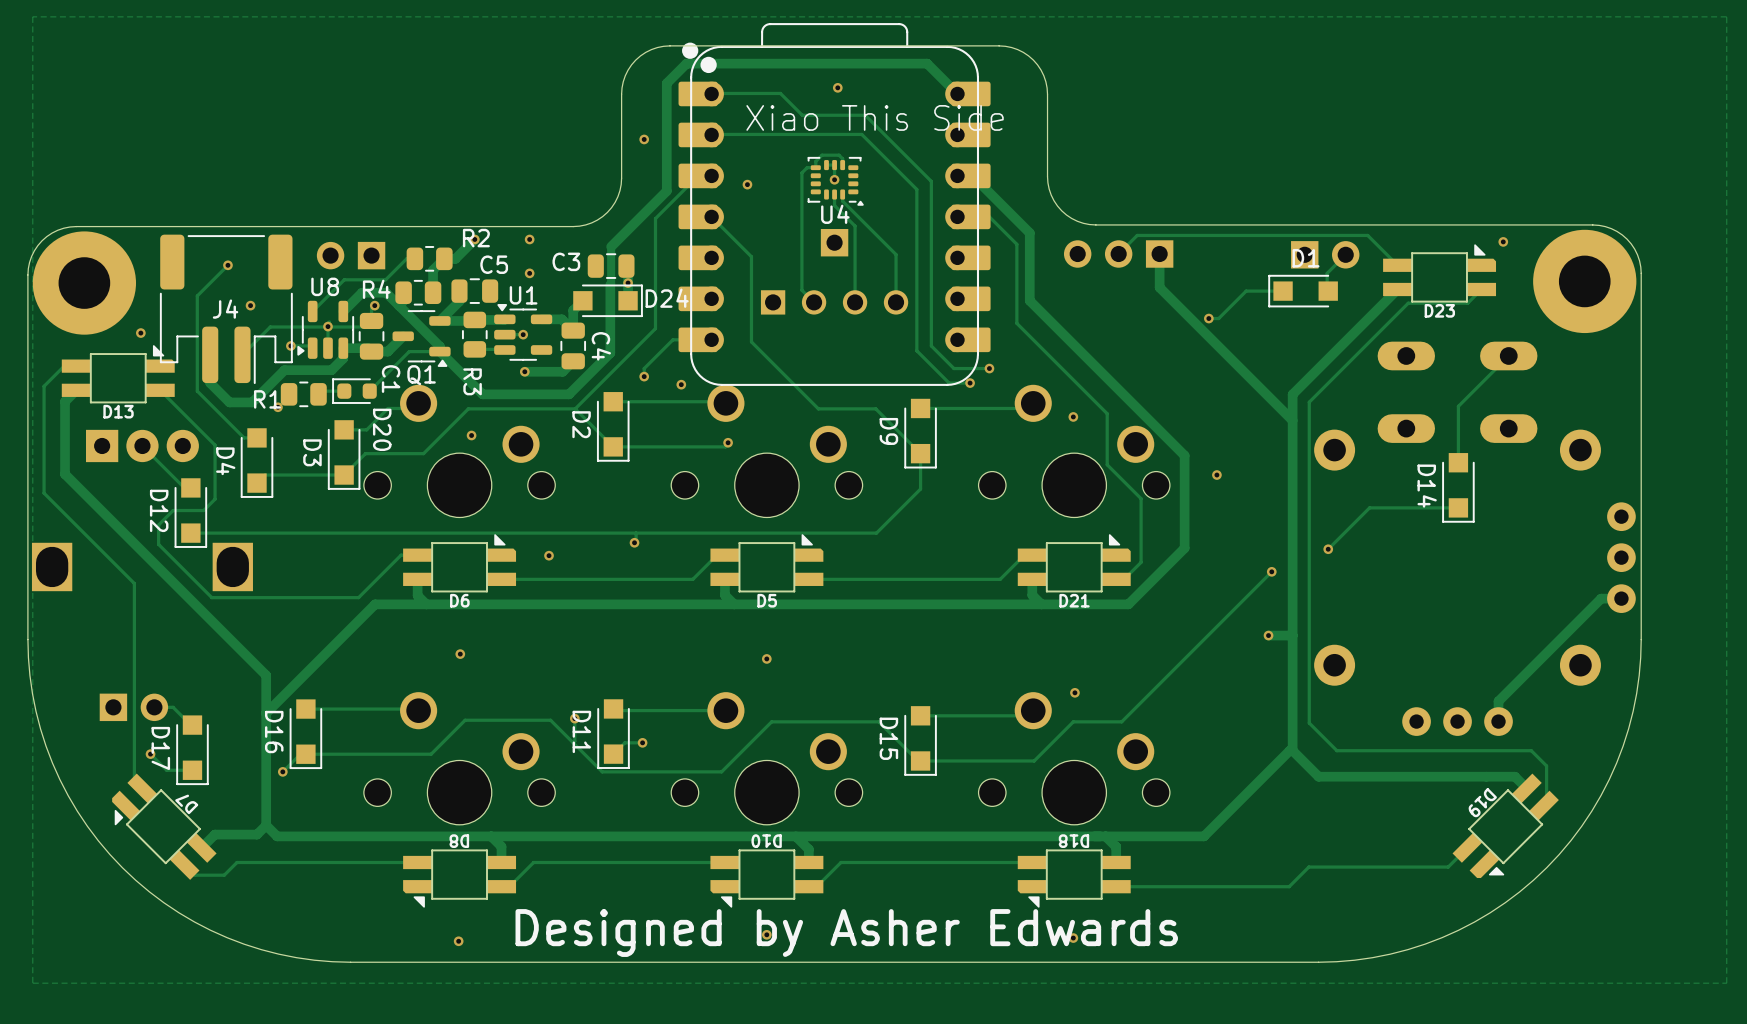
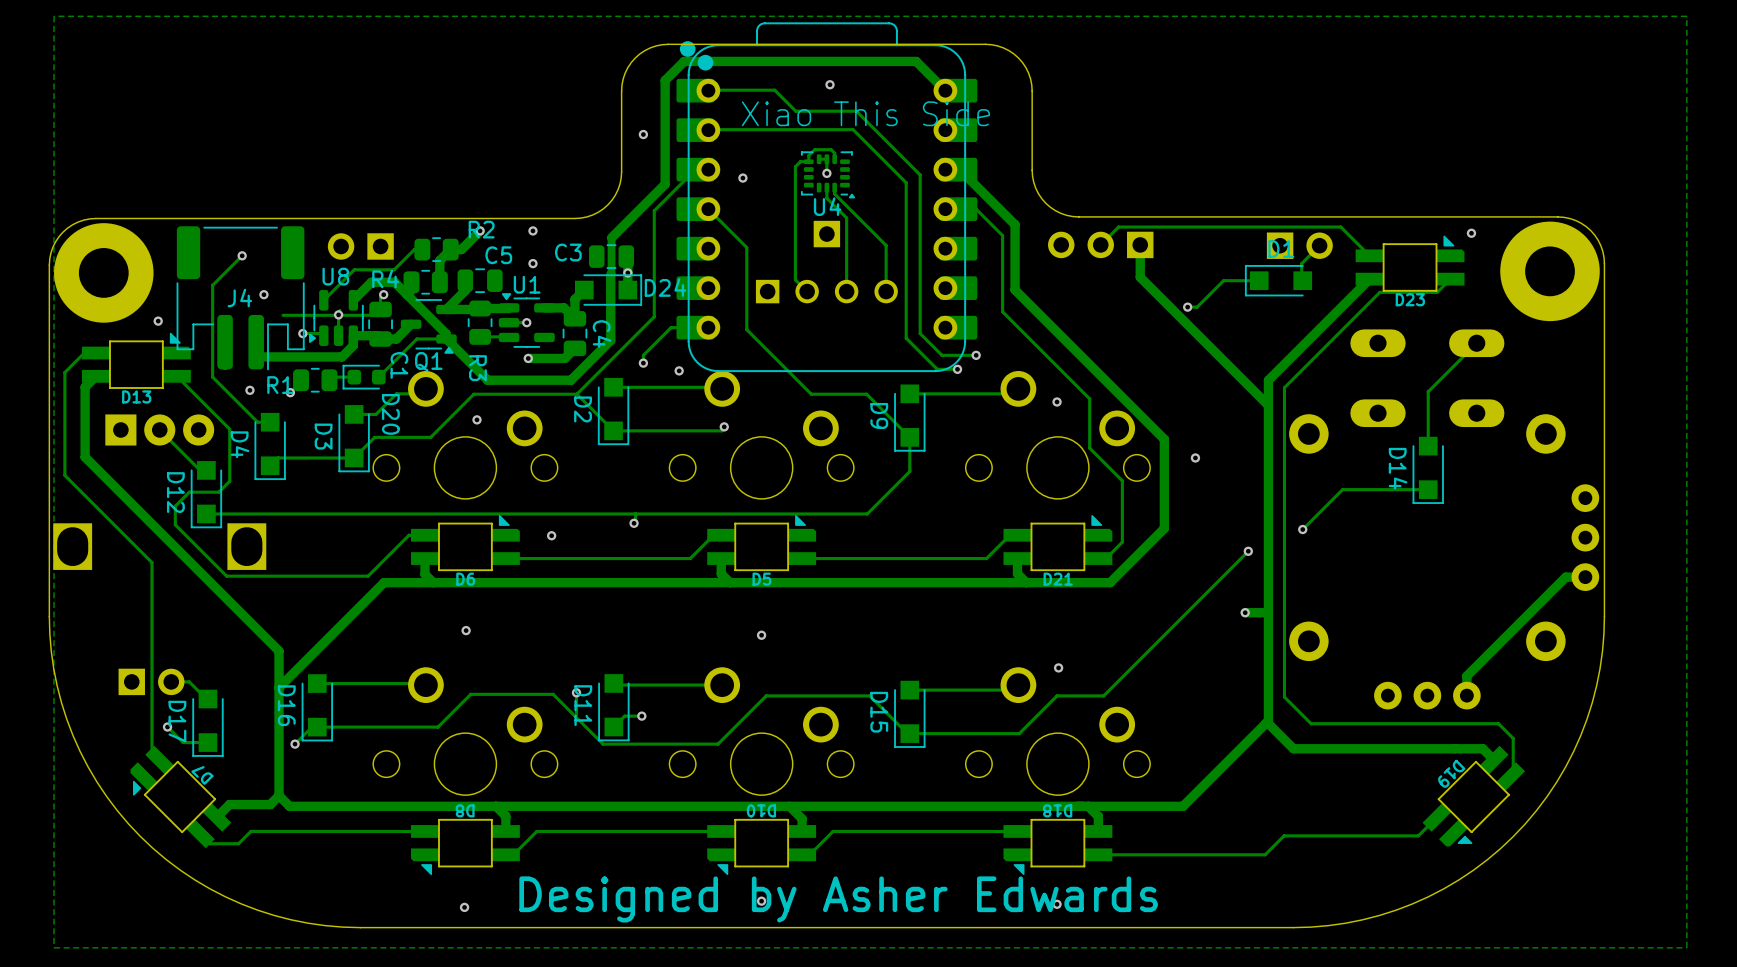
track: (270, 327) (242, 354) -> none
track: (284, 370) (252, 402) (229, 402) (210, 383) (210, 379) -> (296, 356) (256, 356) (256, 342)
via: none -> (249, 390)

